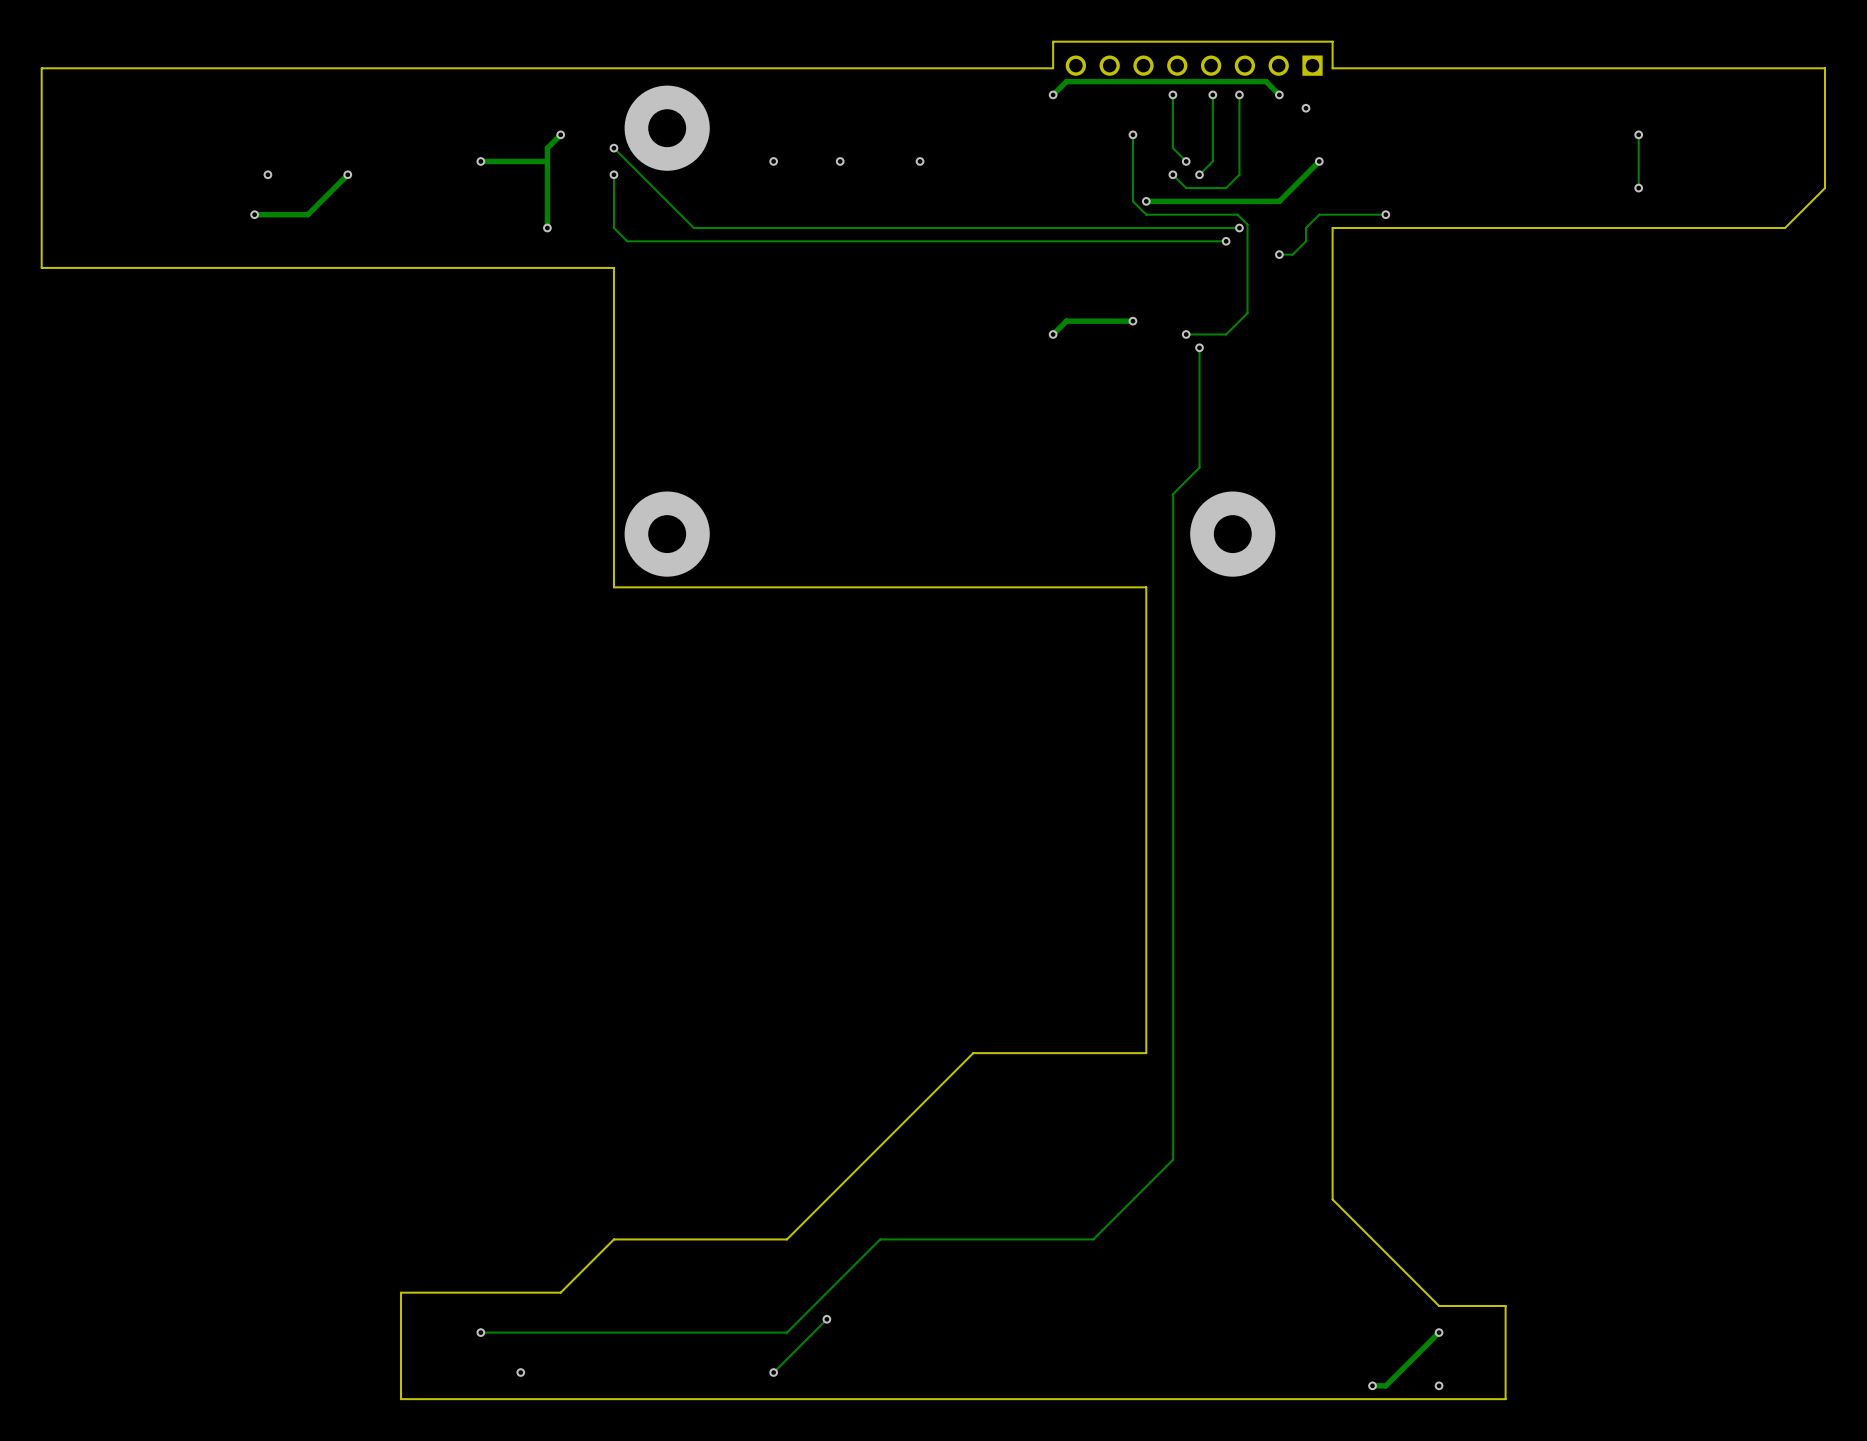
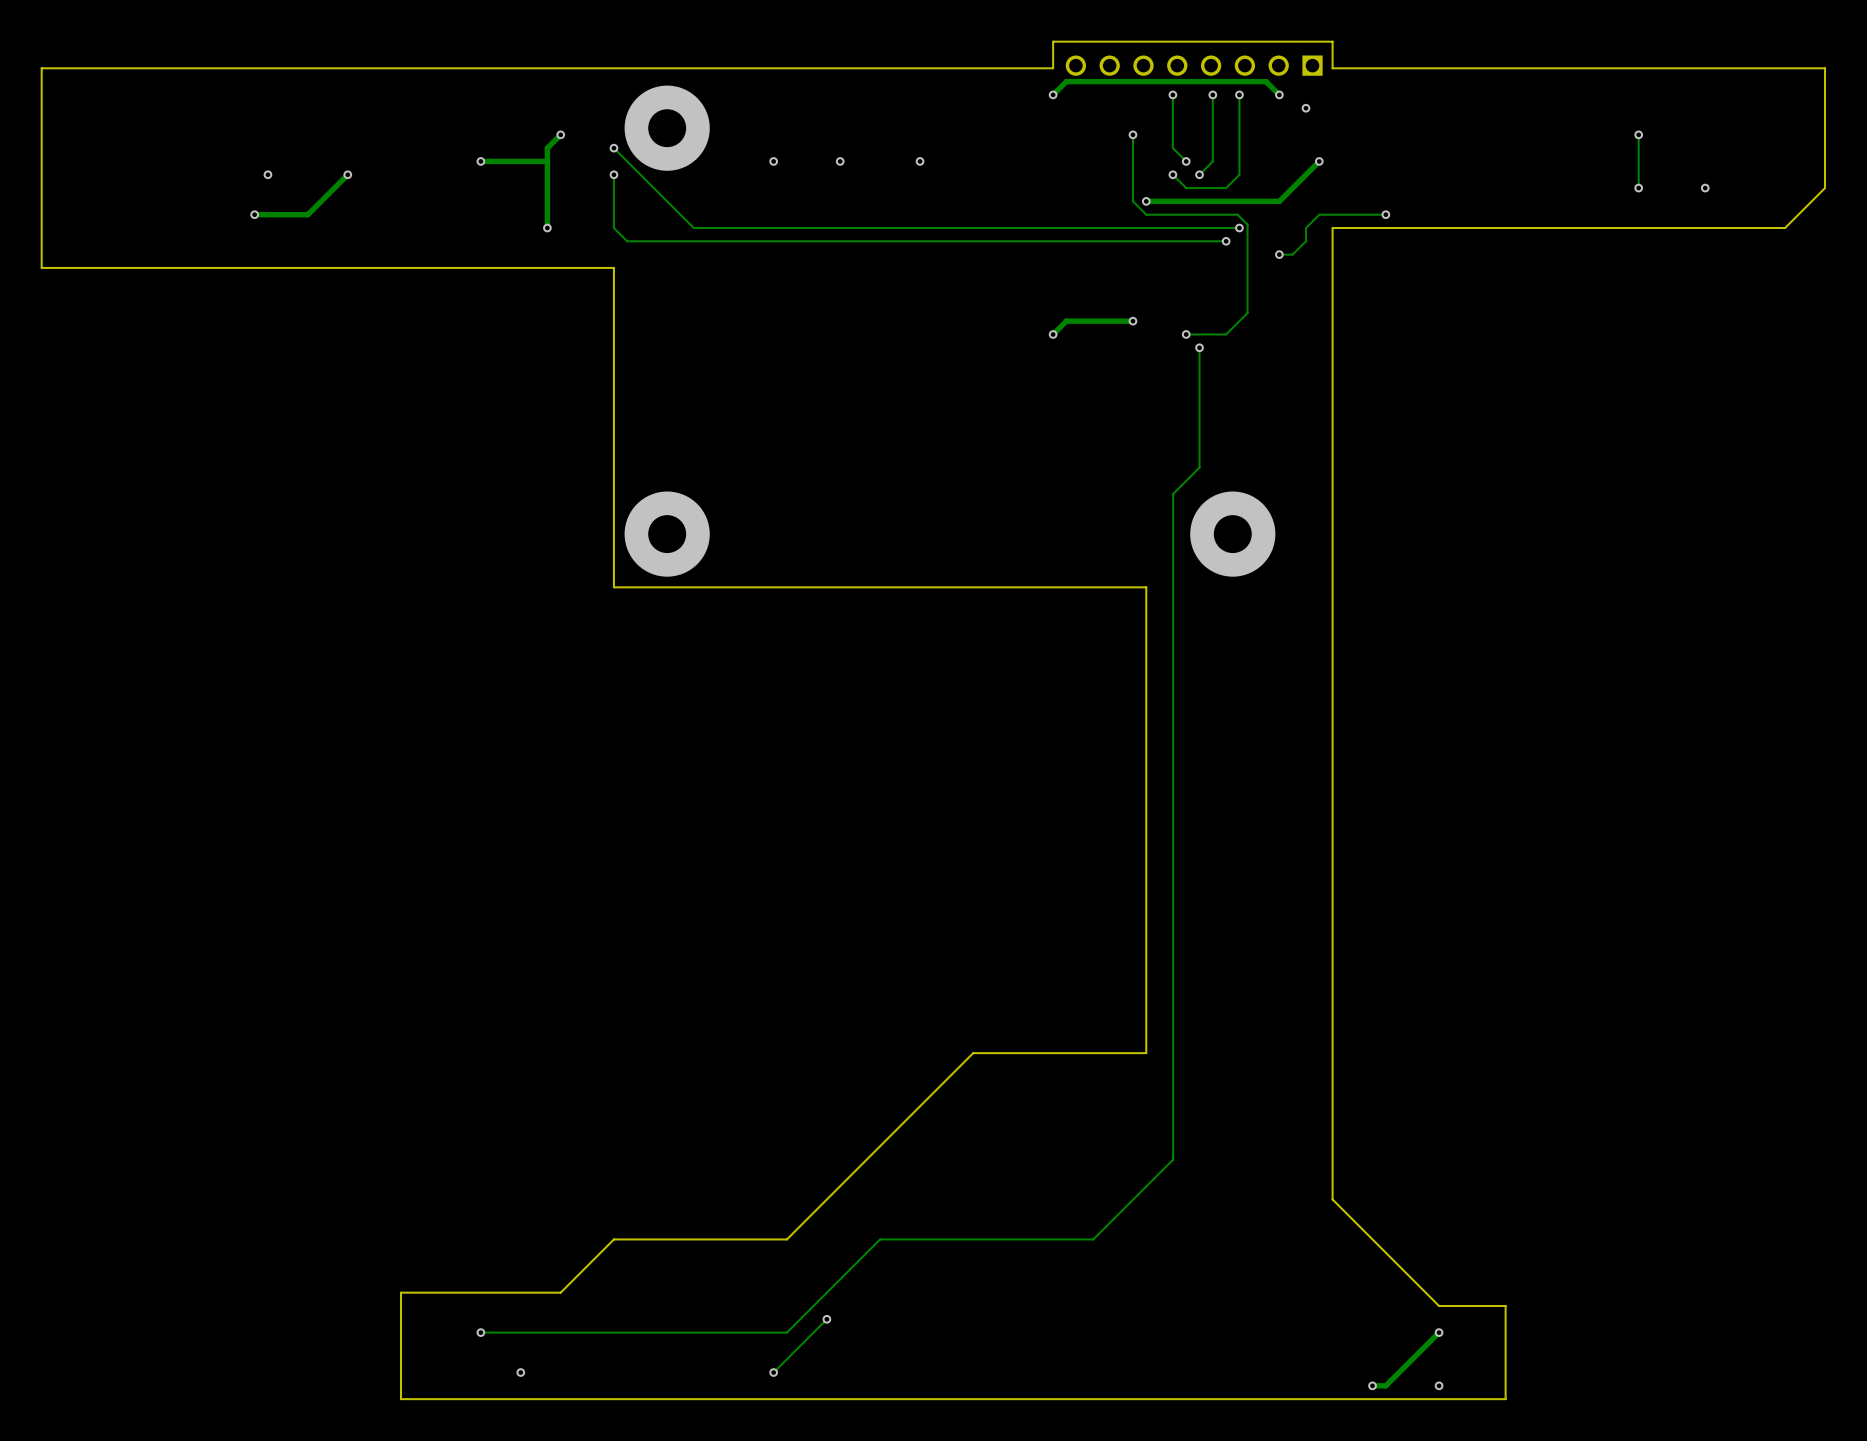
via: none -> (1705, 188)

